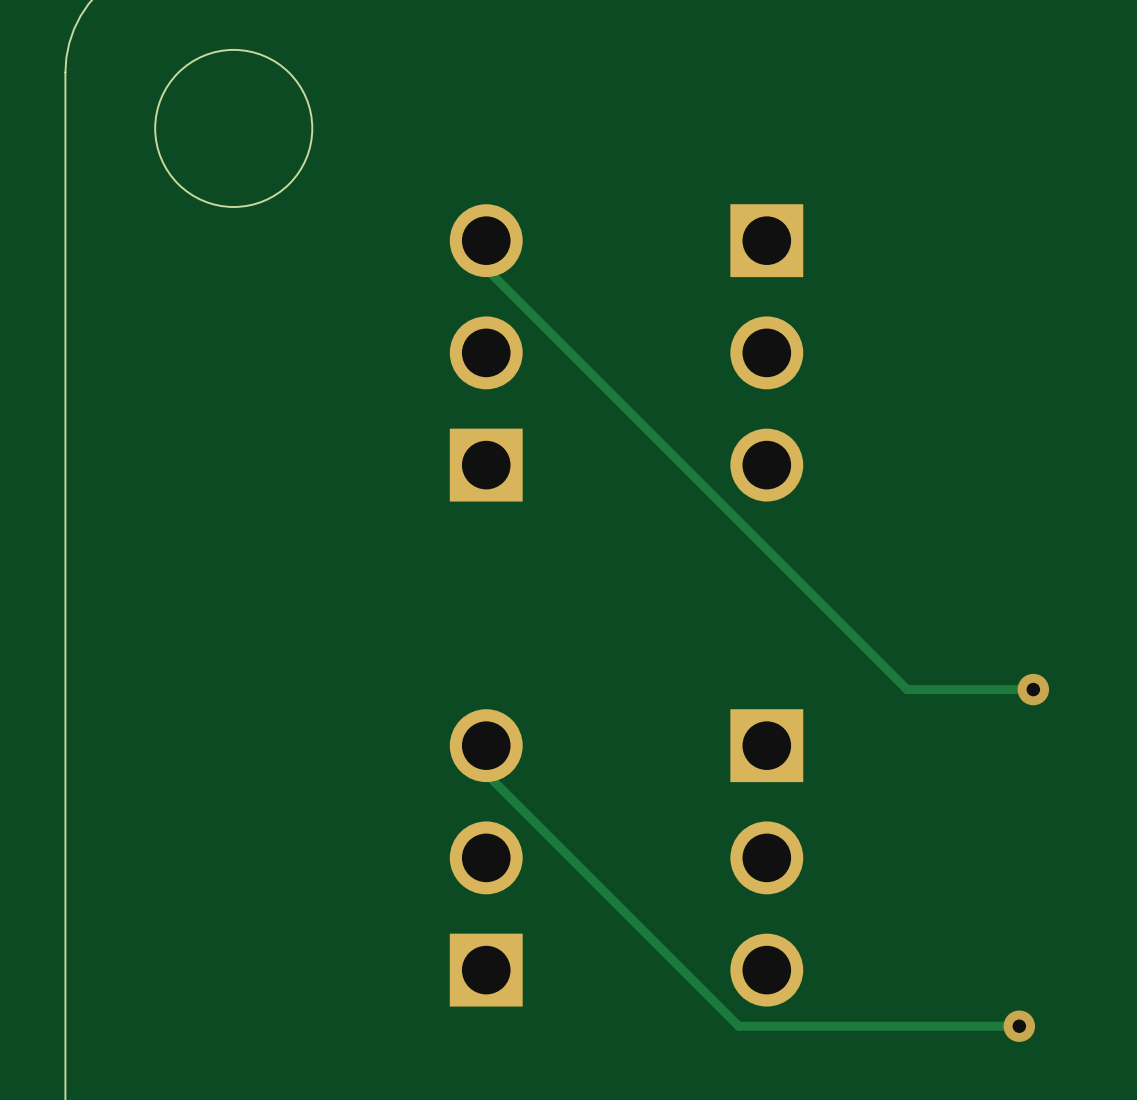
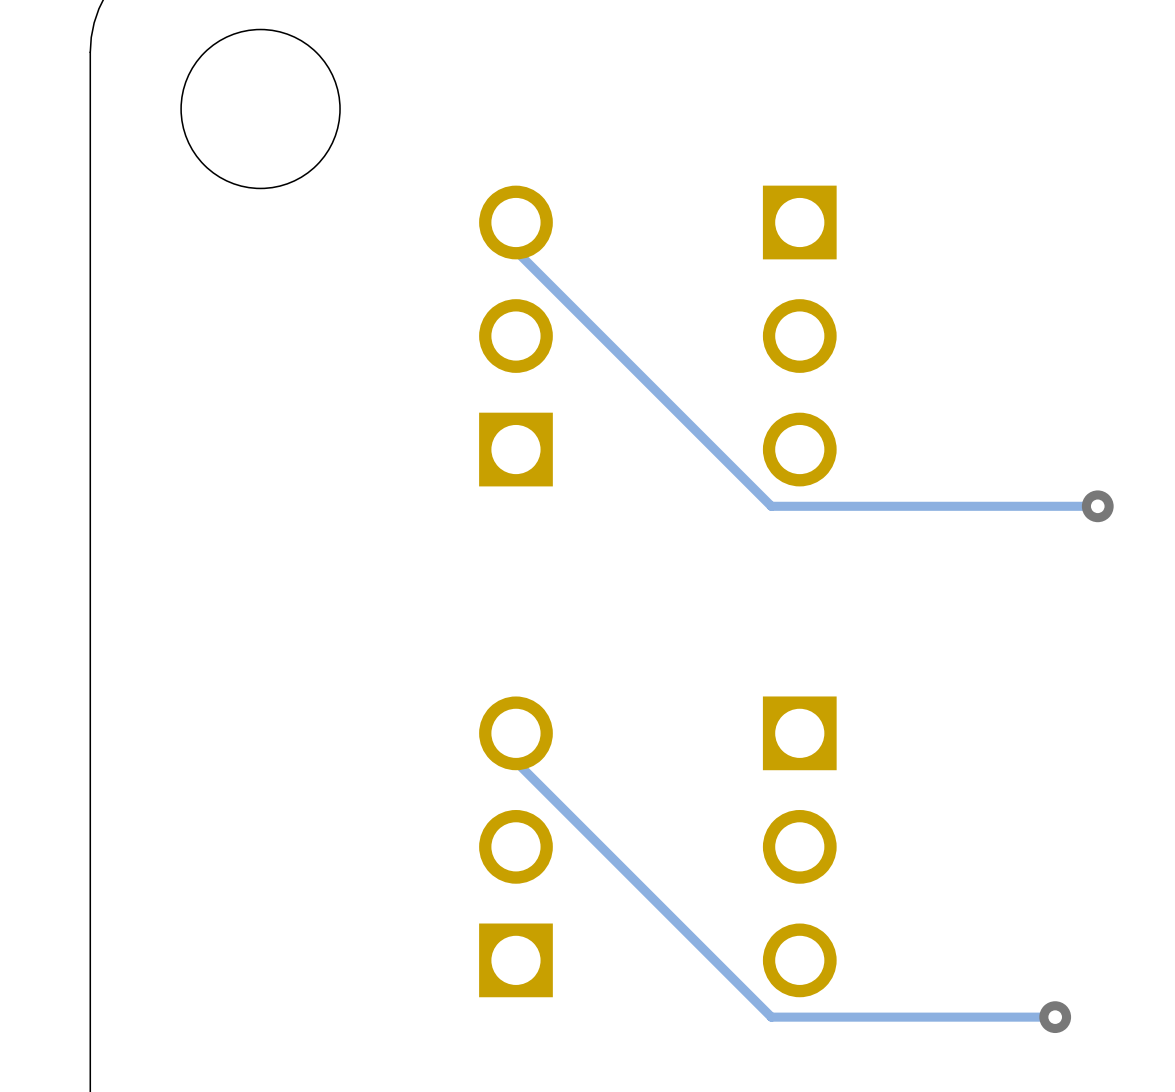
track: (738, 521) (907, 689) (1033, 689) -> (771, 506) (1097, 506)
via position: (1033, 689) -> (1097, 506)

